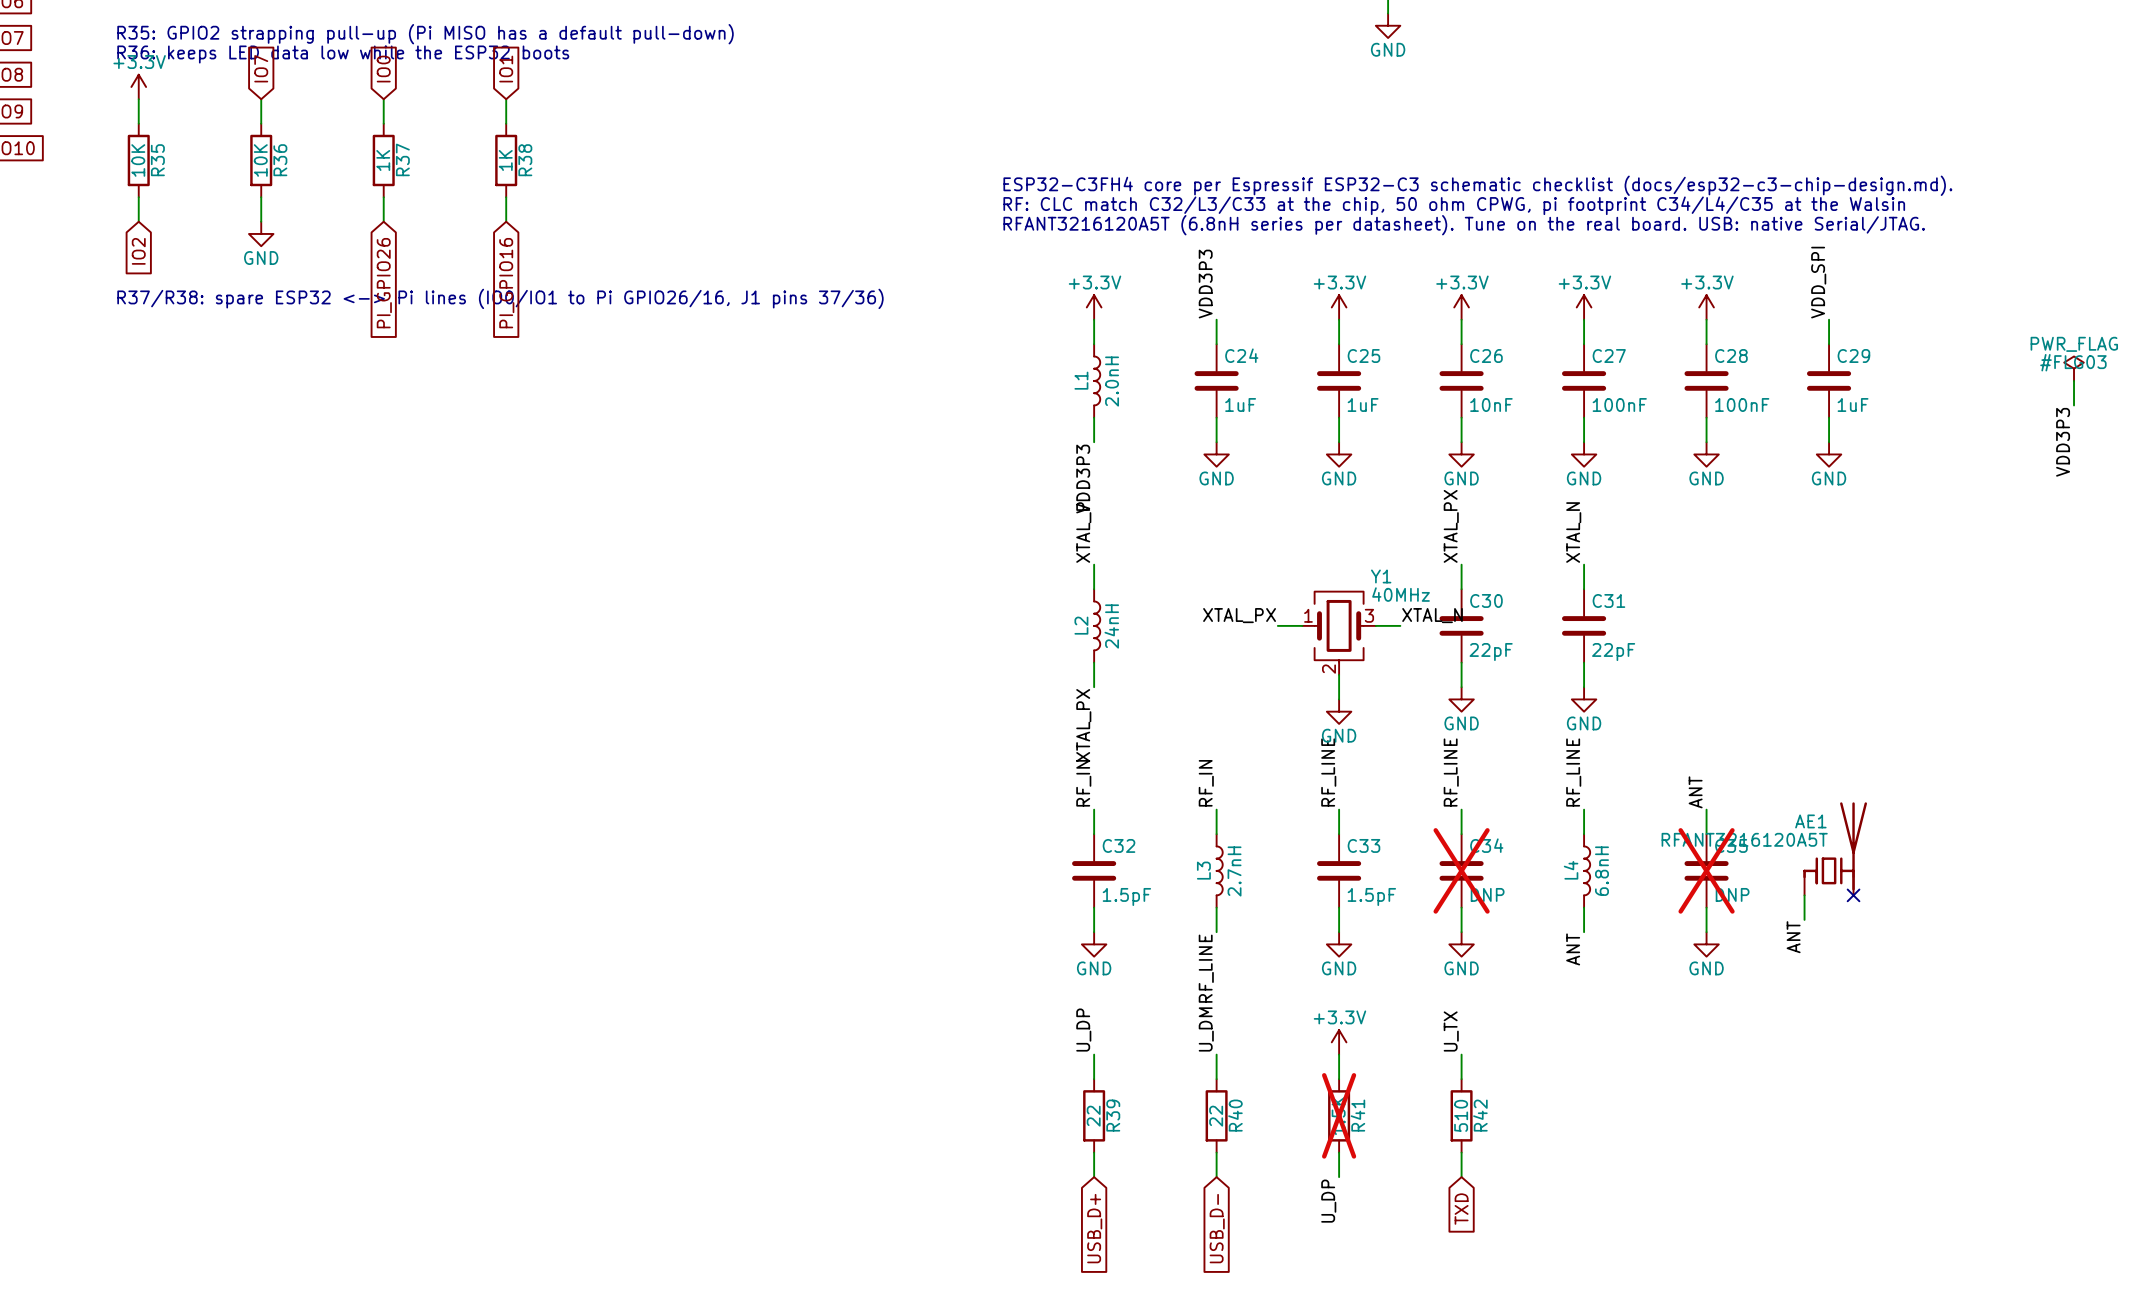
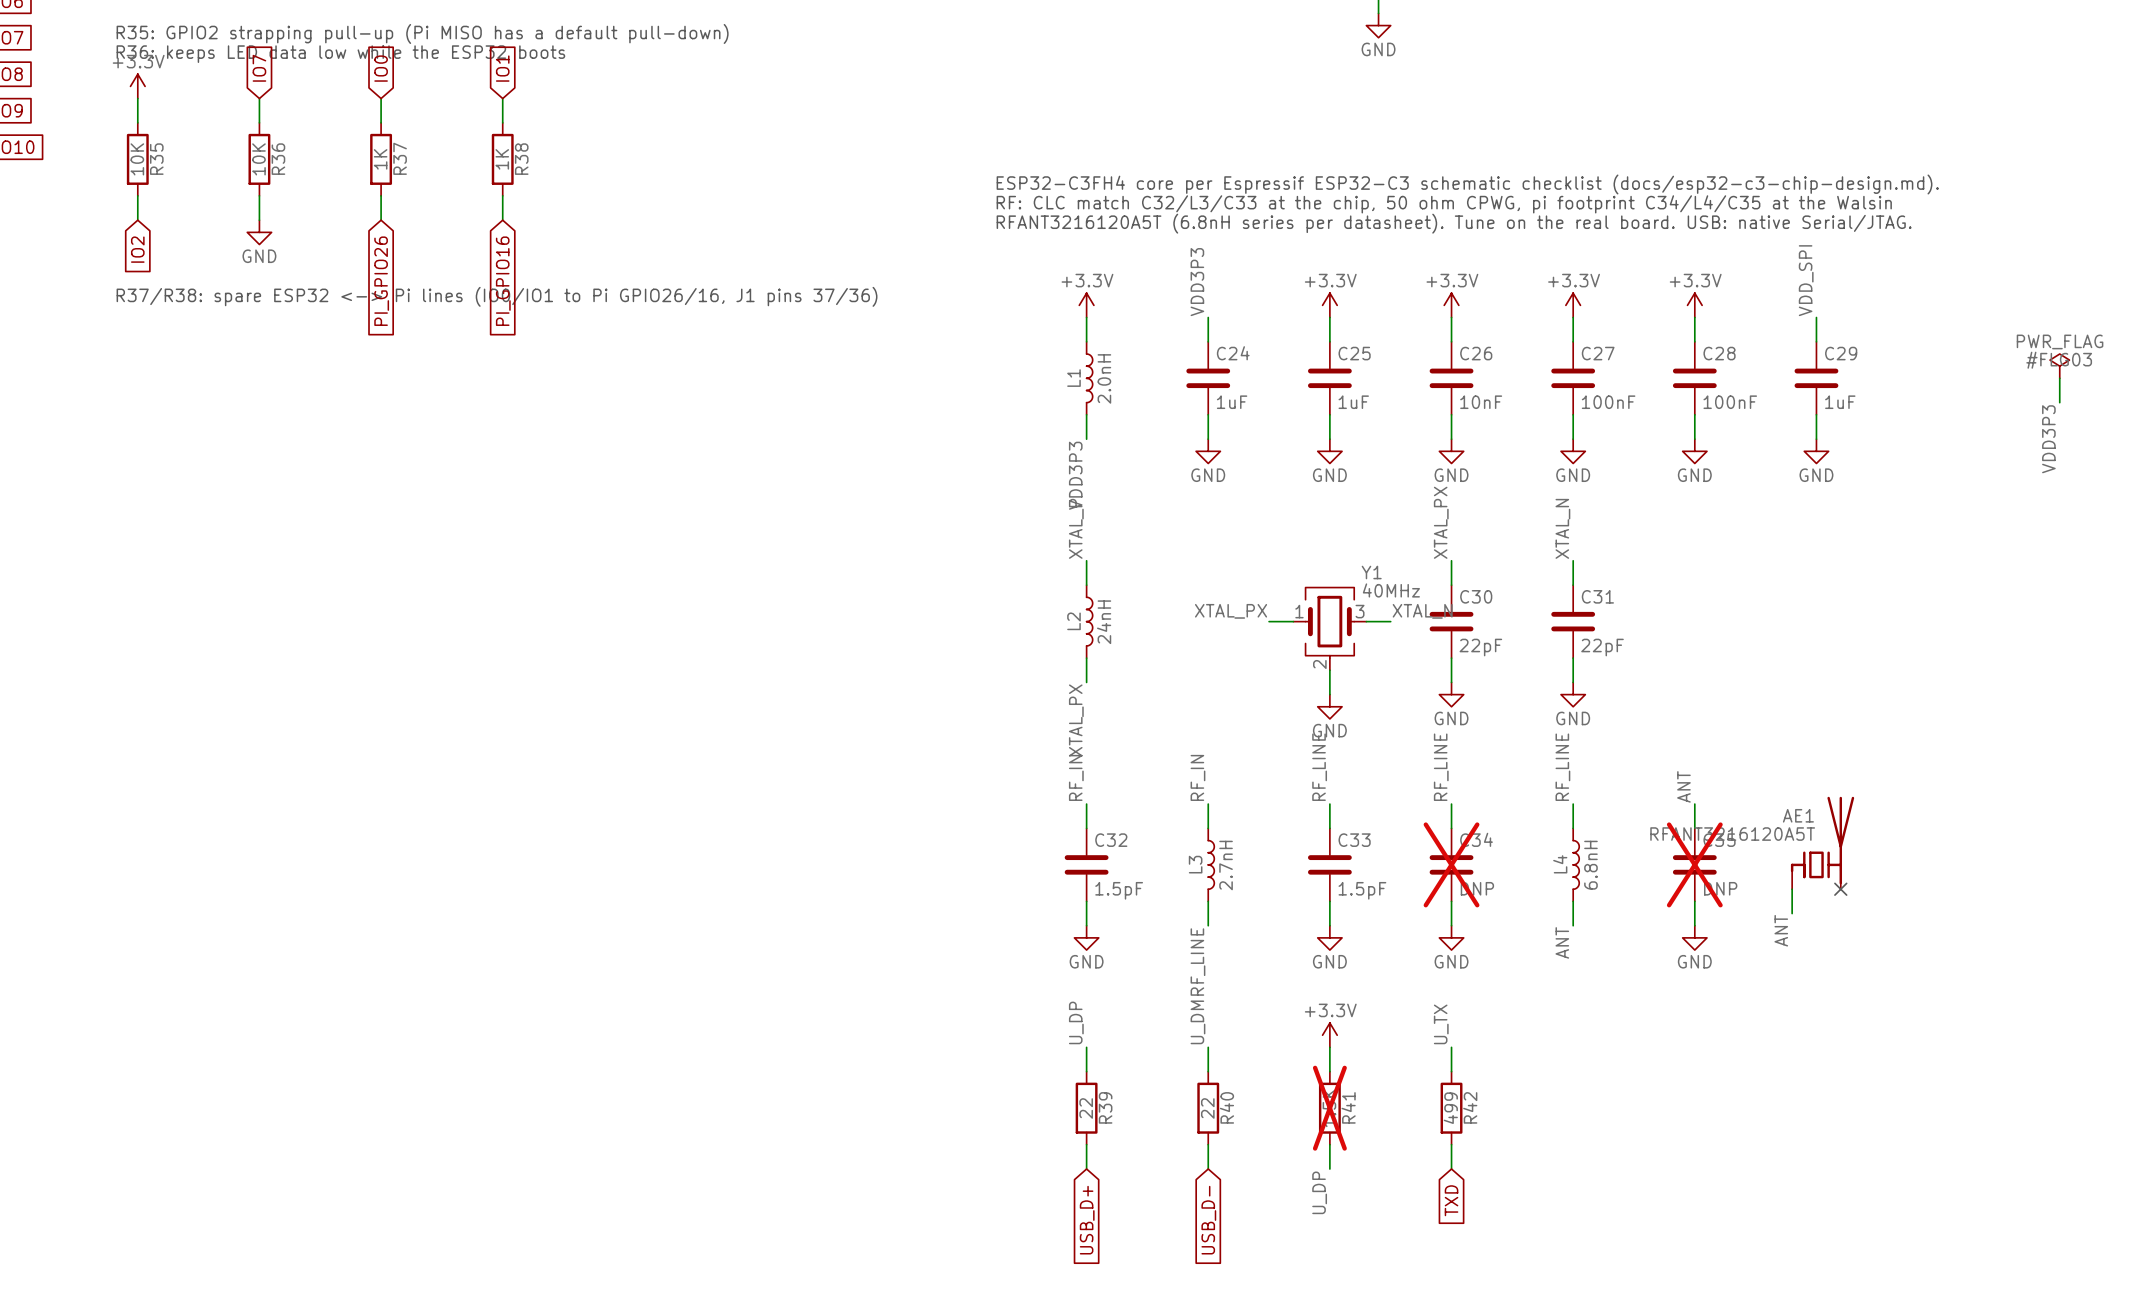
R42 value: 510 (1461, 1115) -> 499 (1450, 1108)

